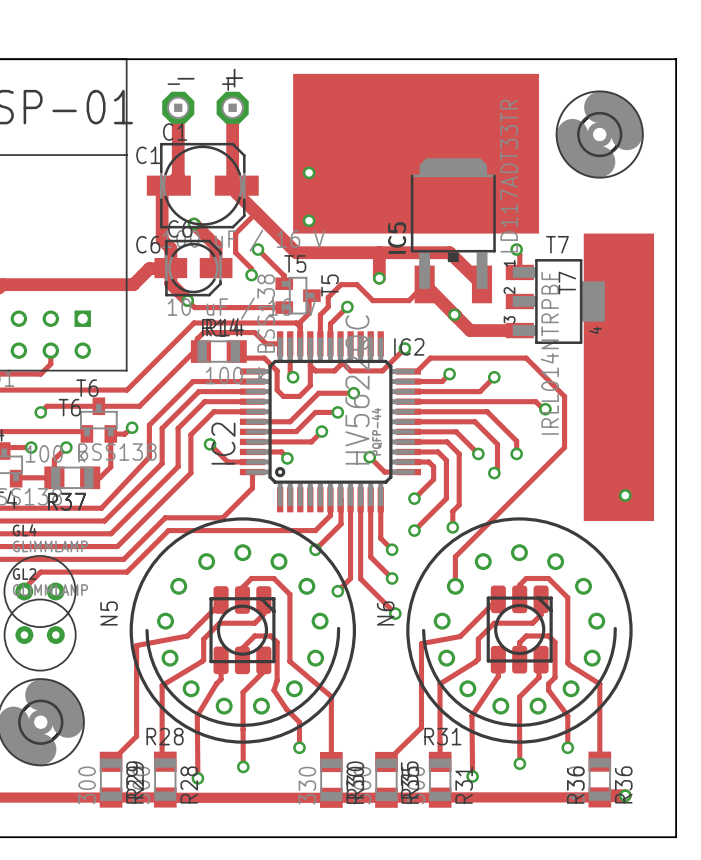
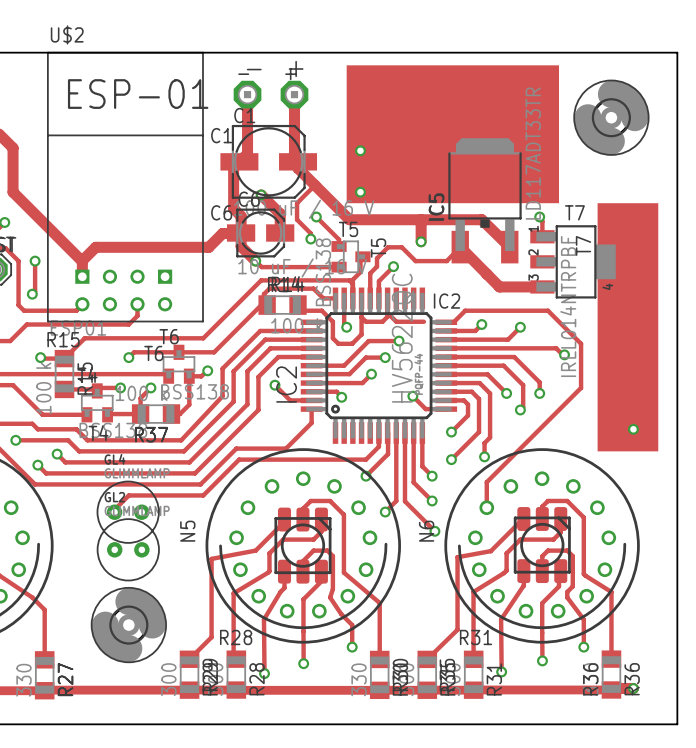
via: (454, 314) -> none
track: (404, 348) (382, 370) -> none
via: (404, 348) -> none

